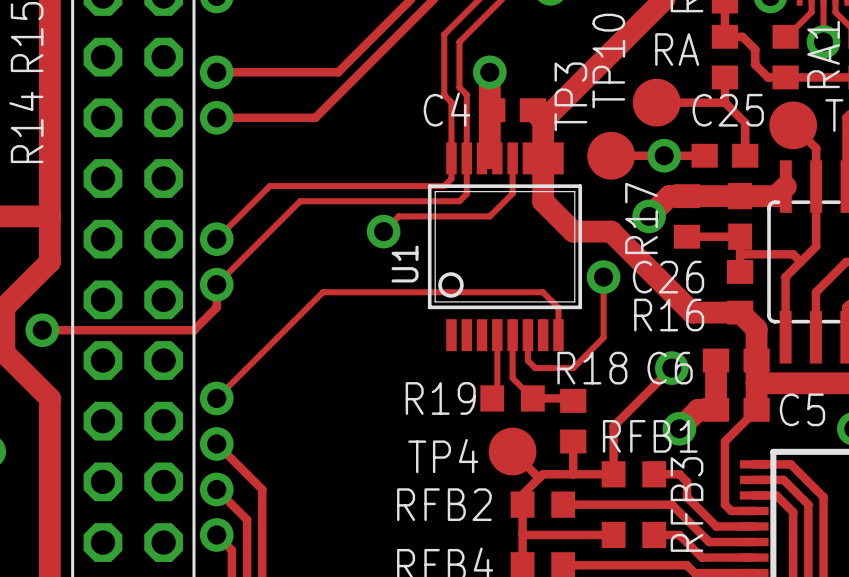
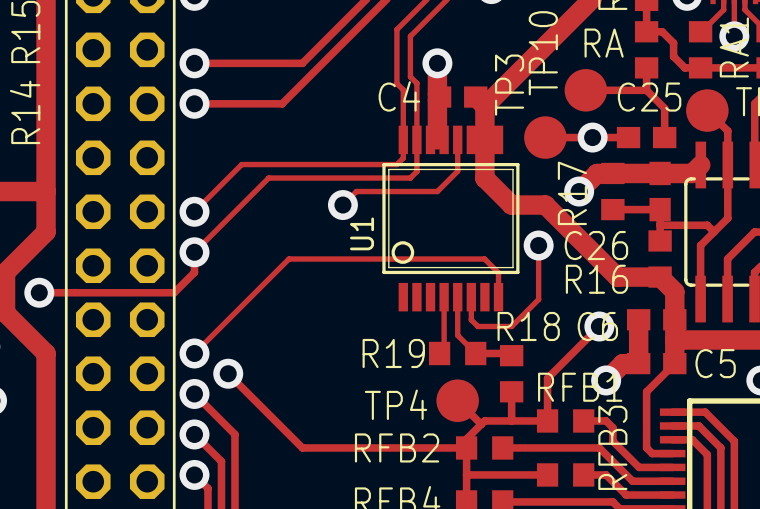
track: none -> (228, 373) (302, 447) (466, 447)
via: none -> (228, 373)

